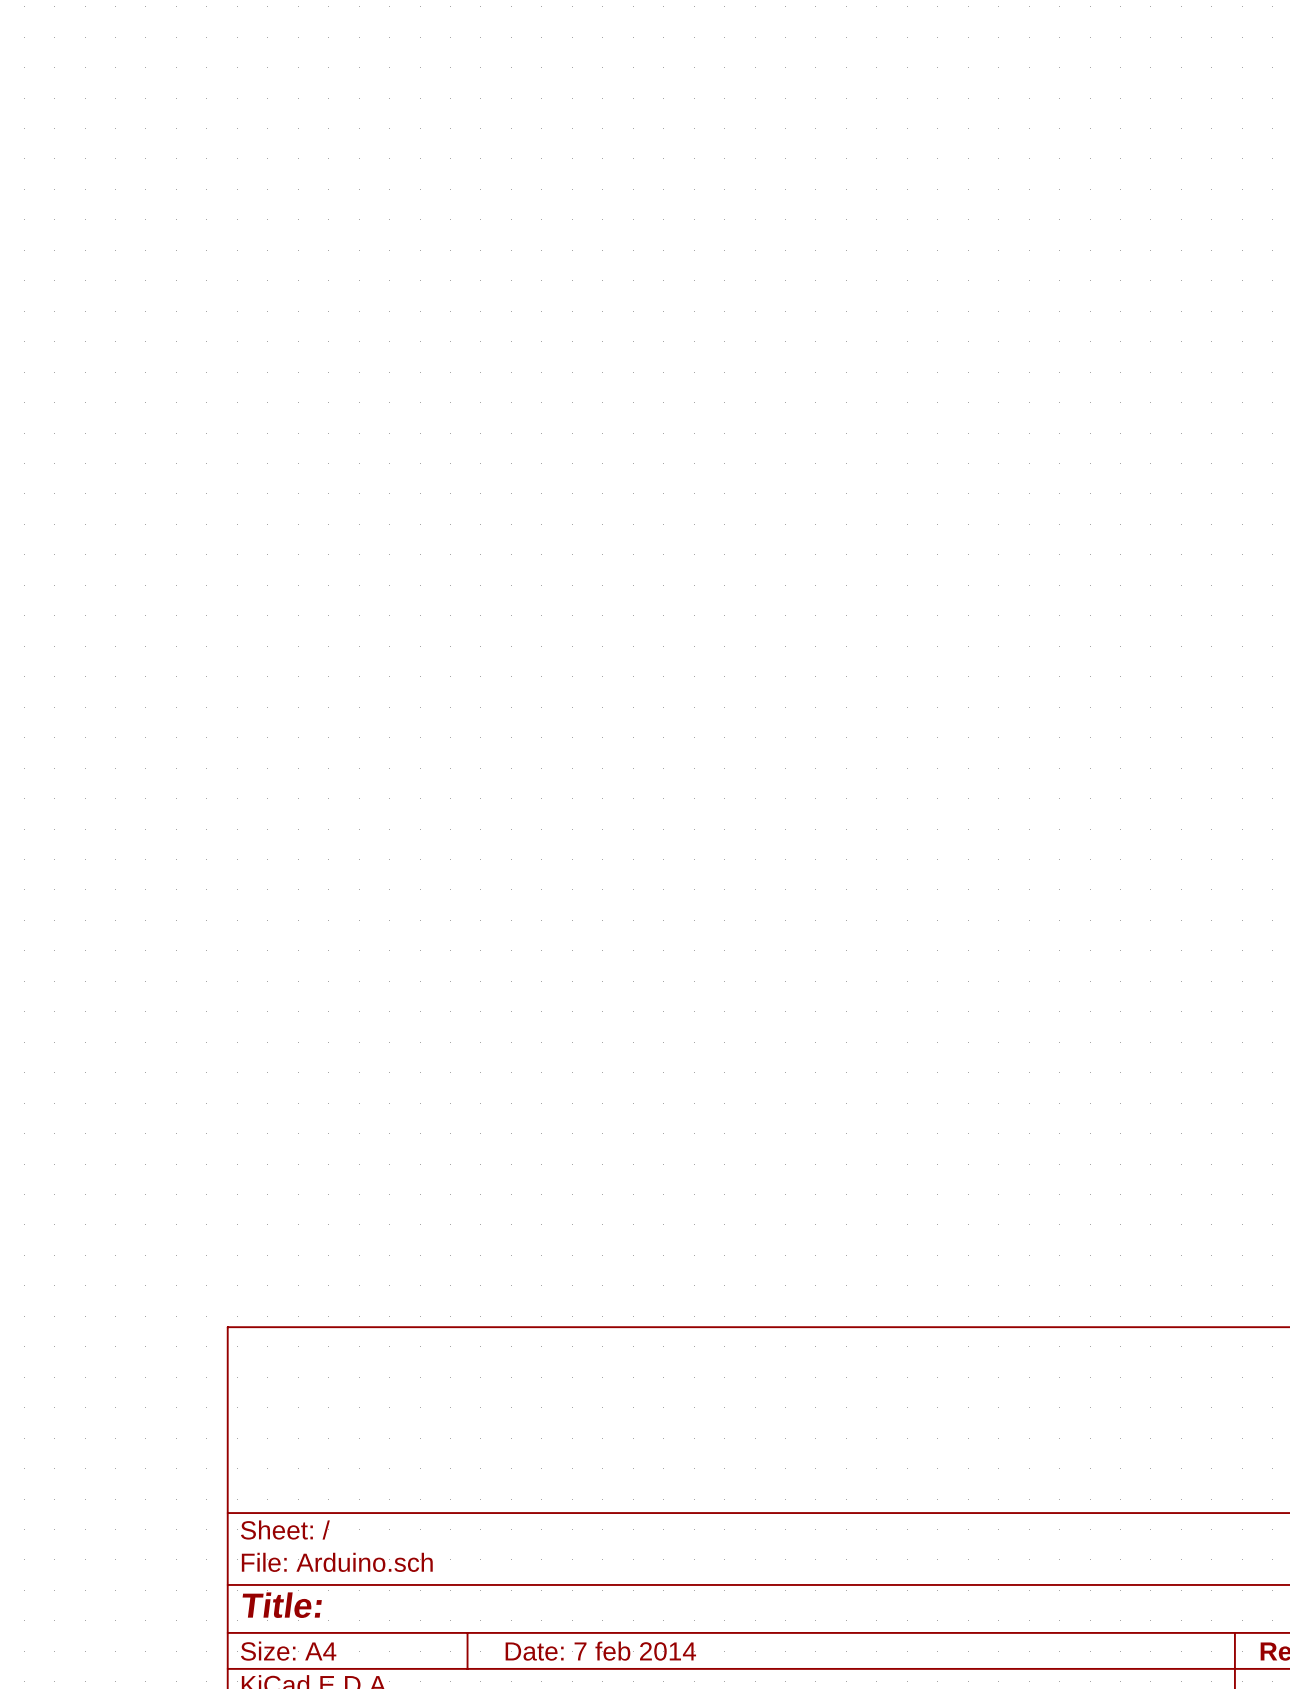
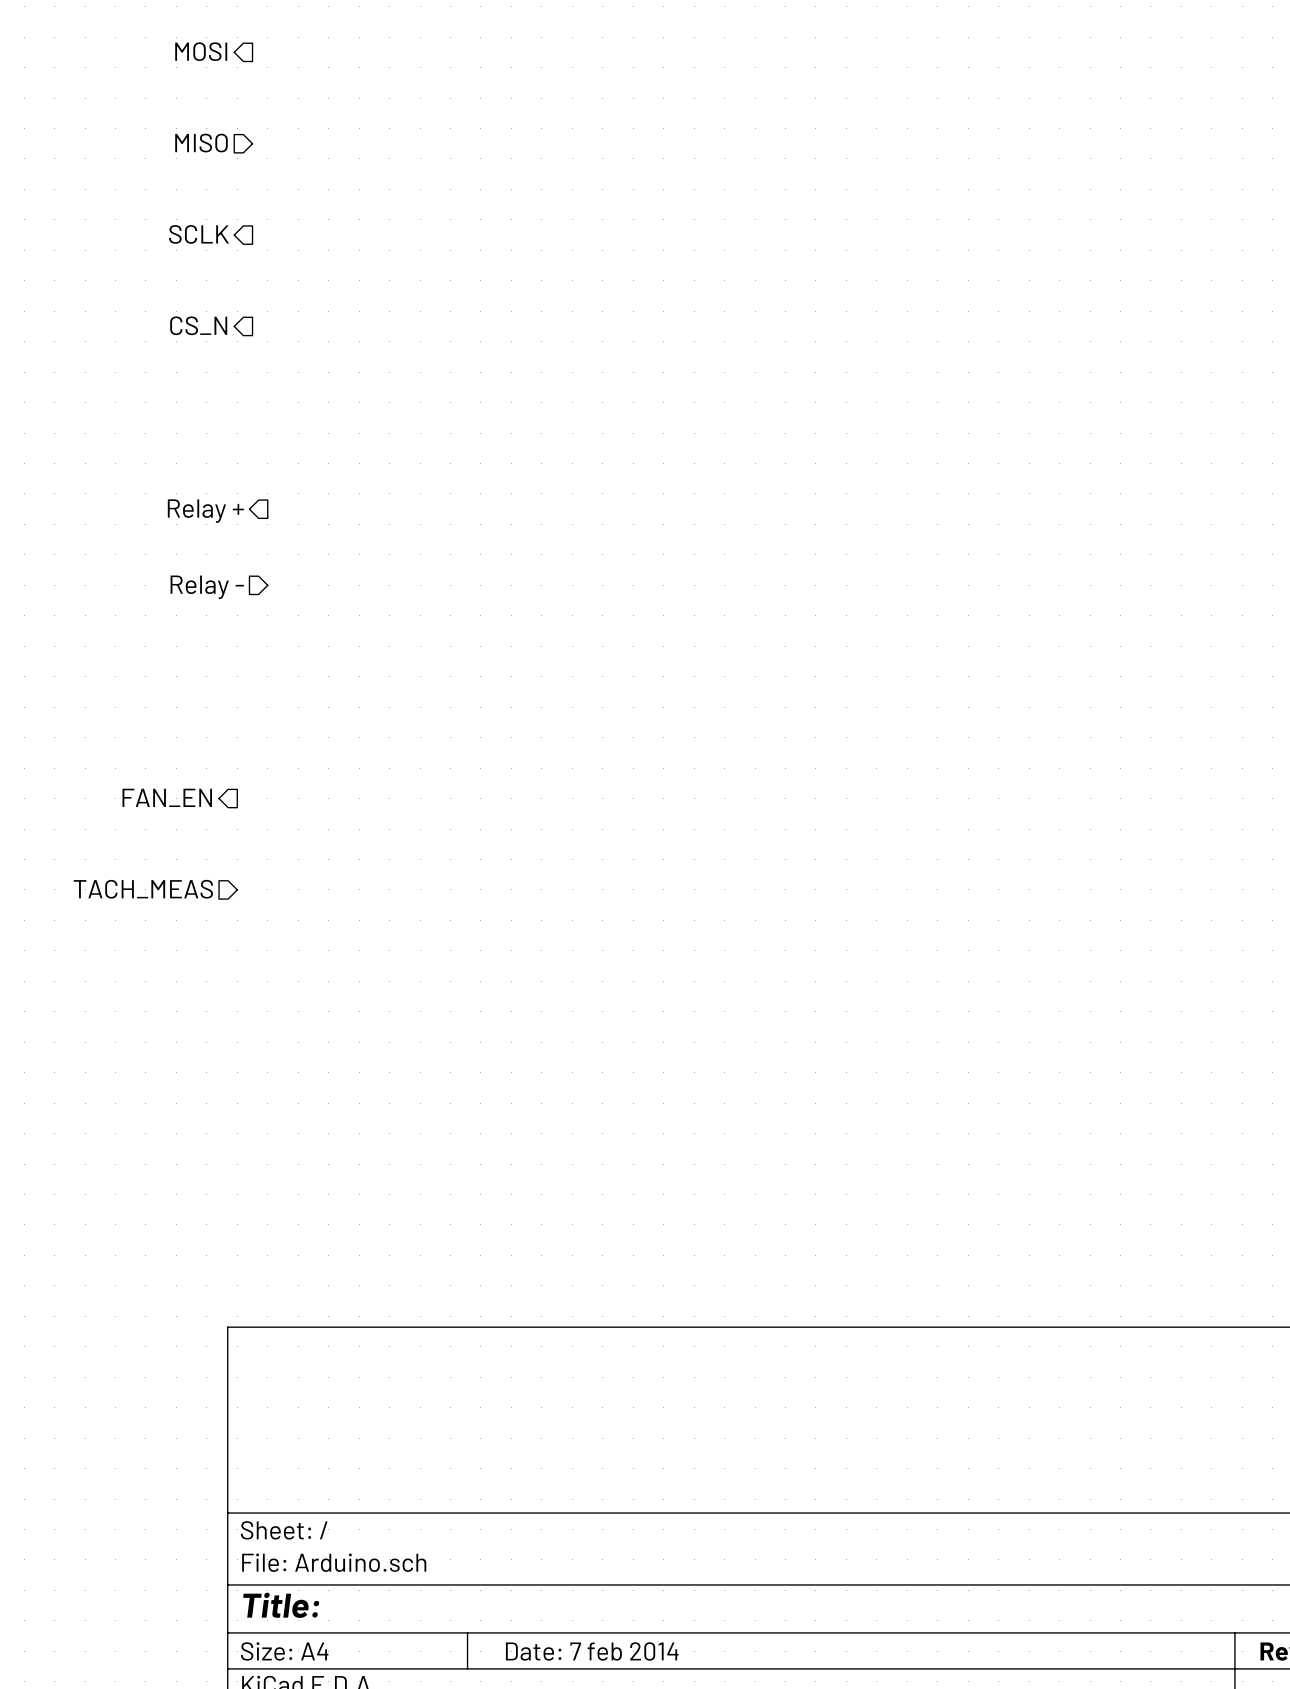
hierarchical label: none -> MOSI (201, 51)
hierarchical label: none -> MISO (201, 143)
hierarchical label: none -> SCLK (199, 234)
hierarchical label: none -> CS_N (198, 325)
hierarchical label: none -> Relay + (205, 511)
hierarchical label: none -> Relay - (207, 587)
hierarchical label: none -> FAN_EN (167, 797)
hierarchical label: none -> TACH_MEAS (143, 889)

